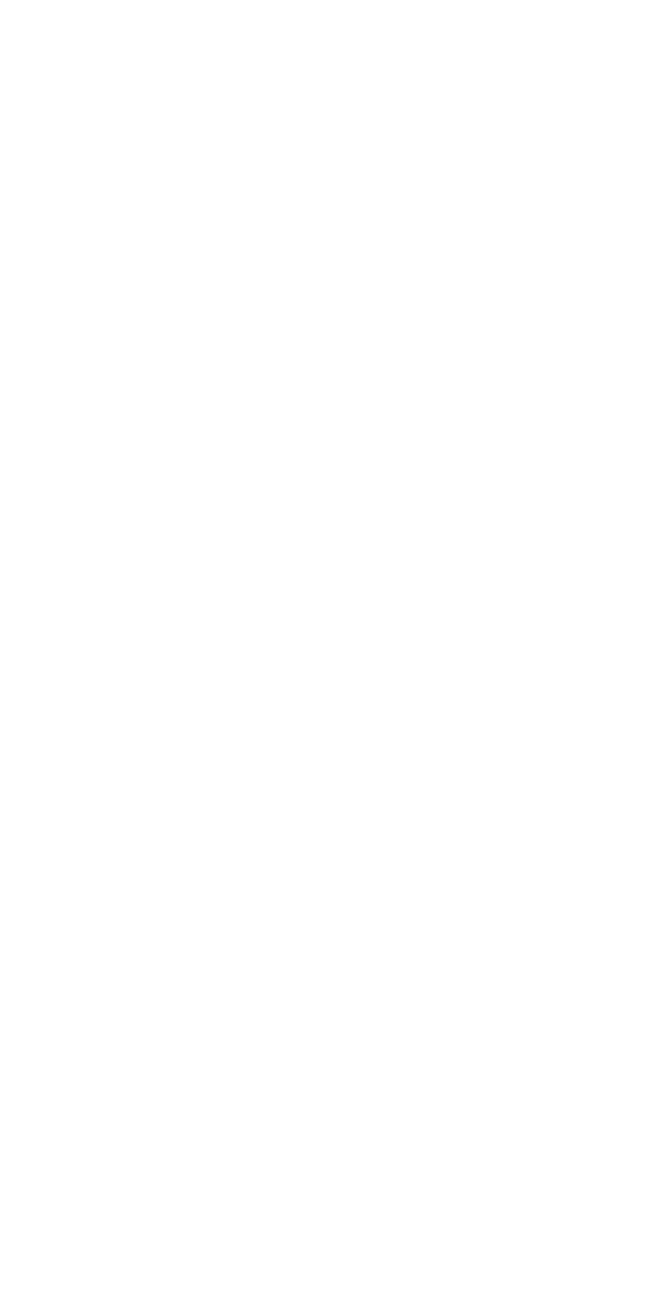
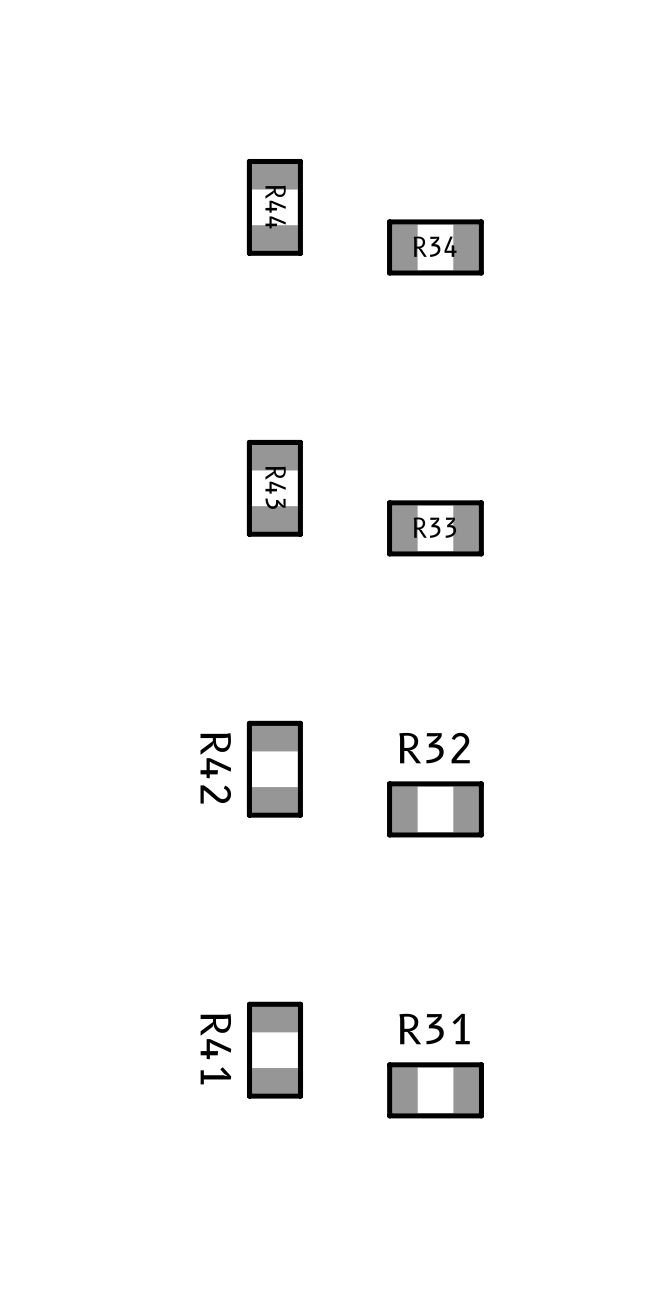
R44: none -> (274, 207)
R34: none -> (435, 247)
R43: none -> (274, 488)
R33: none -> (435, 528)
R42: none -> (274, 769)
R32: none -> (435, 809)
R41: none -> (275, 1050)
R31: none -> (435, 1090)

